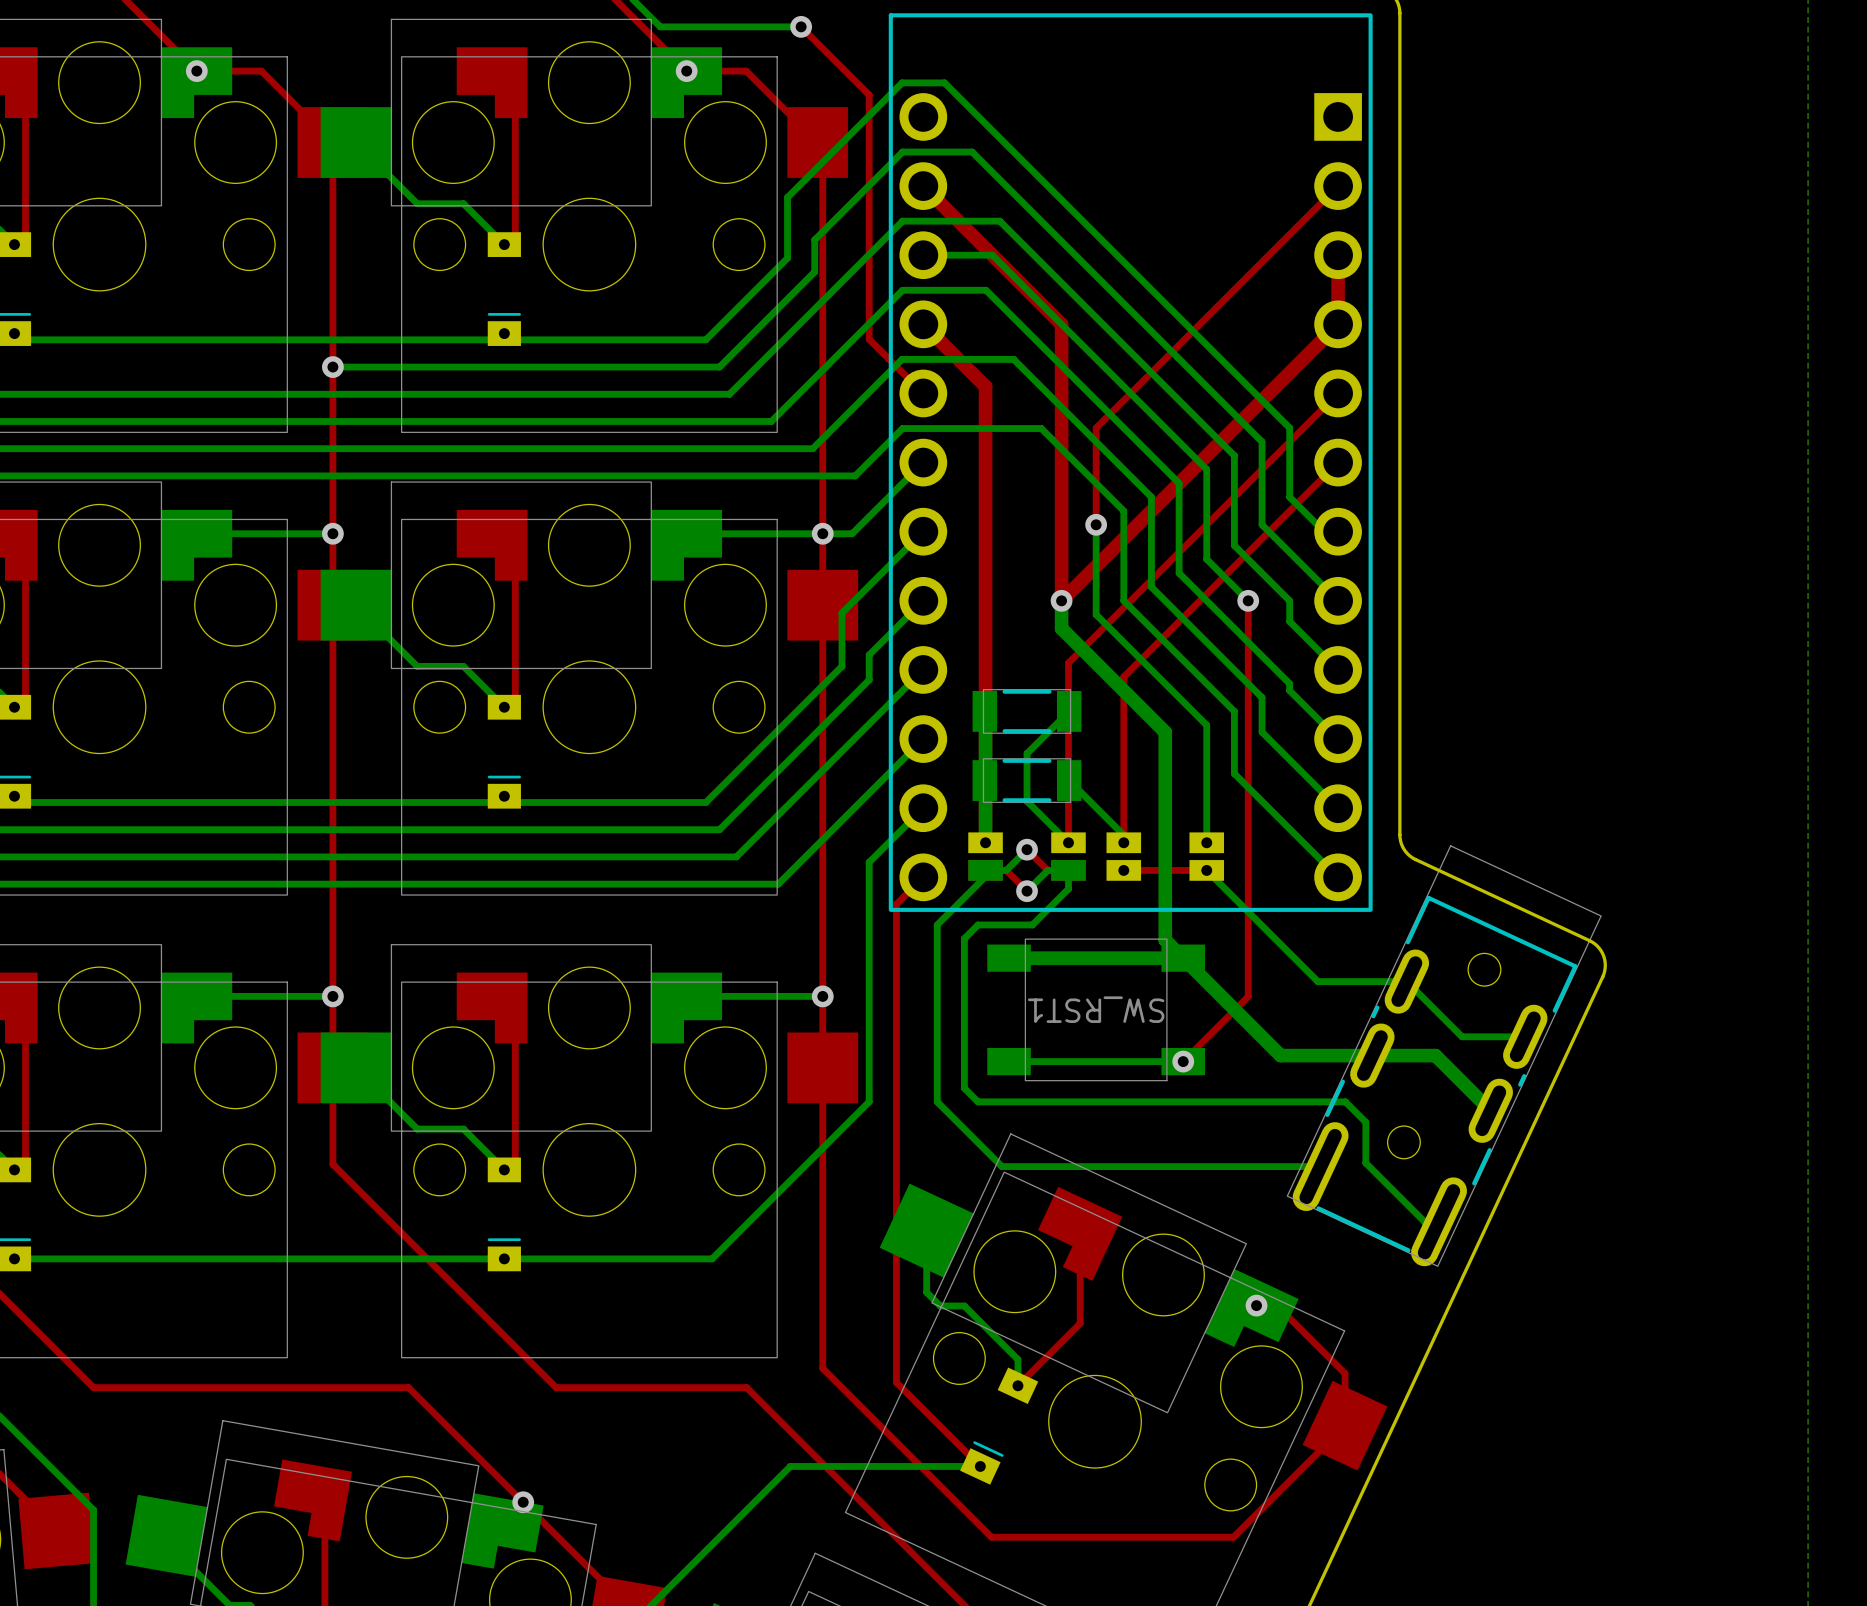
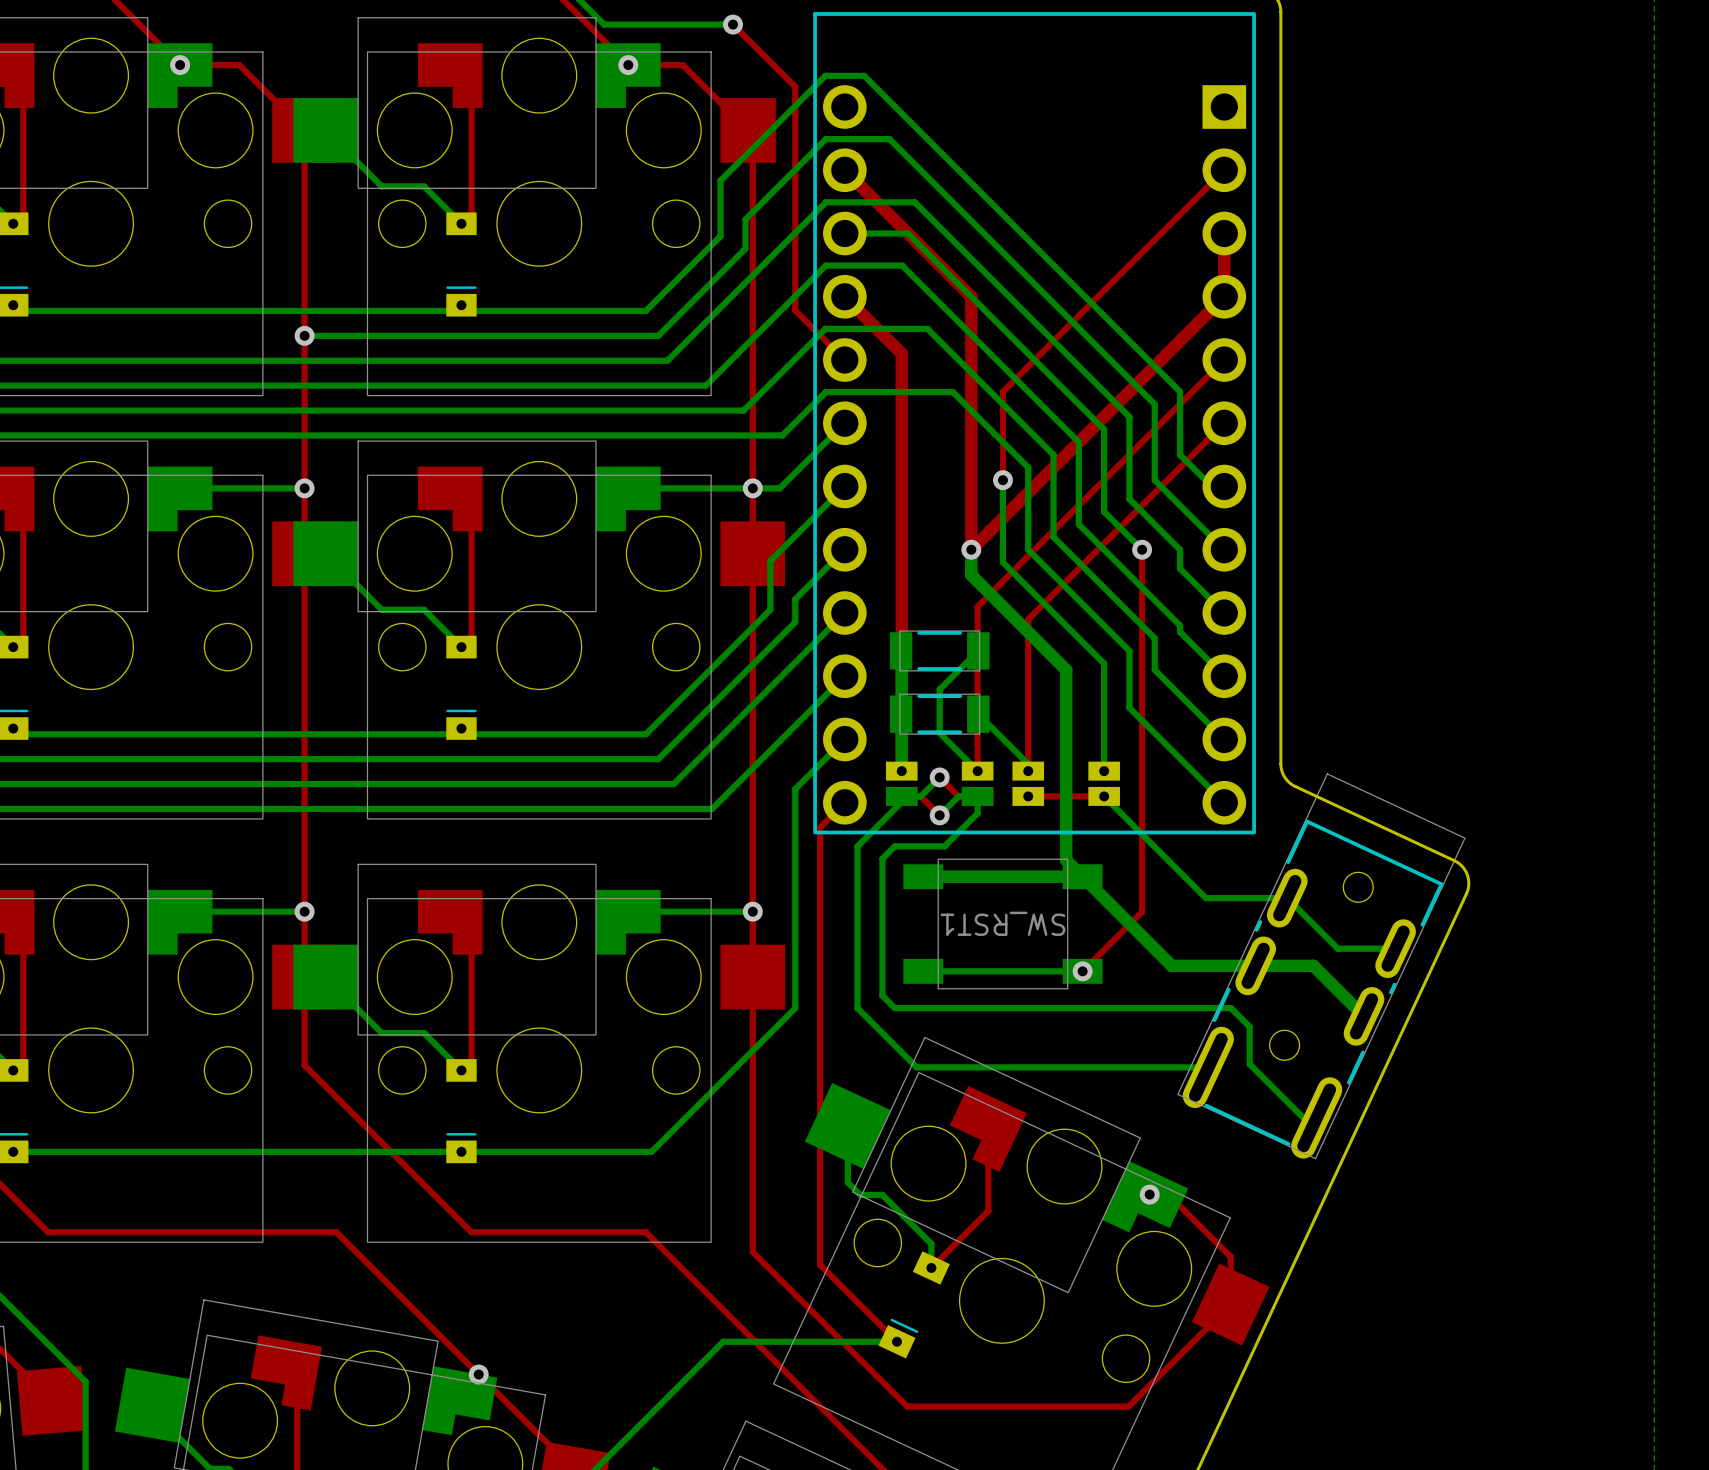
top track: (52, 1346) (93, 1387) (408, 1387) -> (48, 1232) (336, 1232) (373, 1269)
top track: (515, 1346) (556, 1387) (746, 1387) -> (471, 1232) (645, 1232) (683, 1269)

